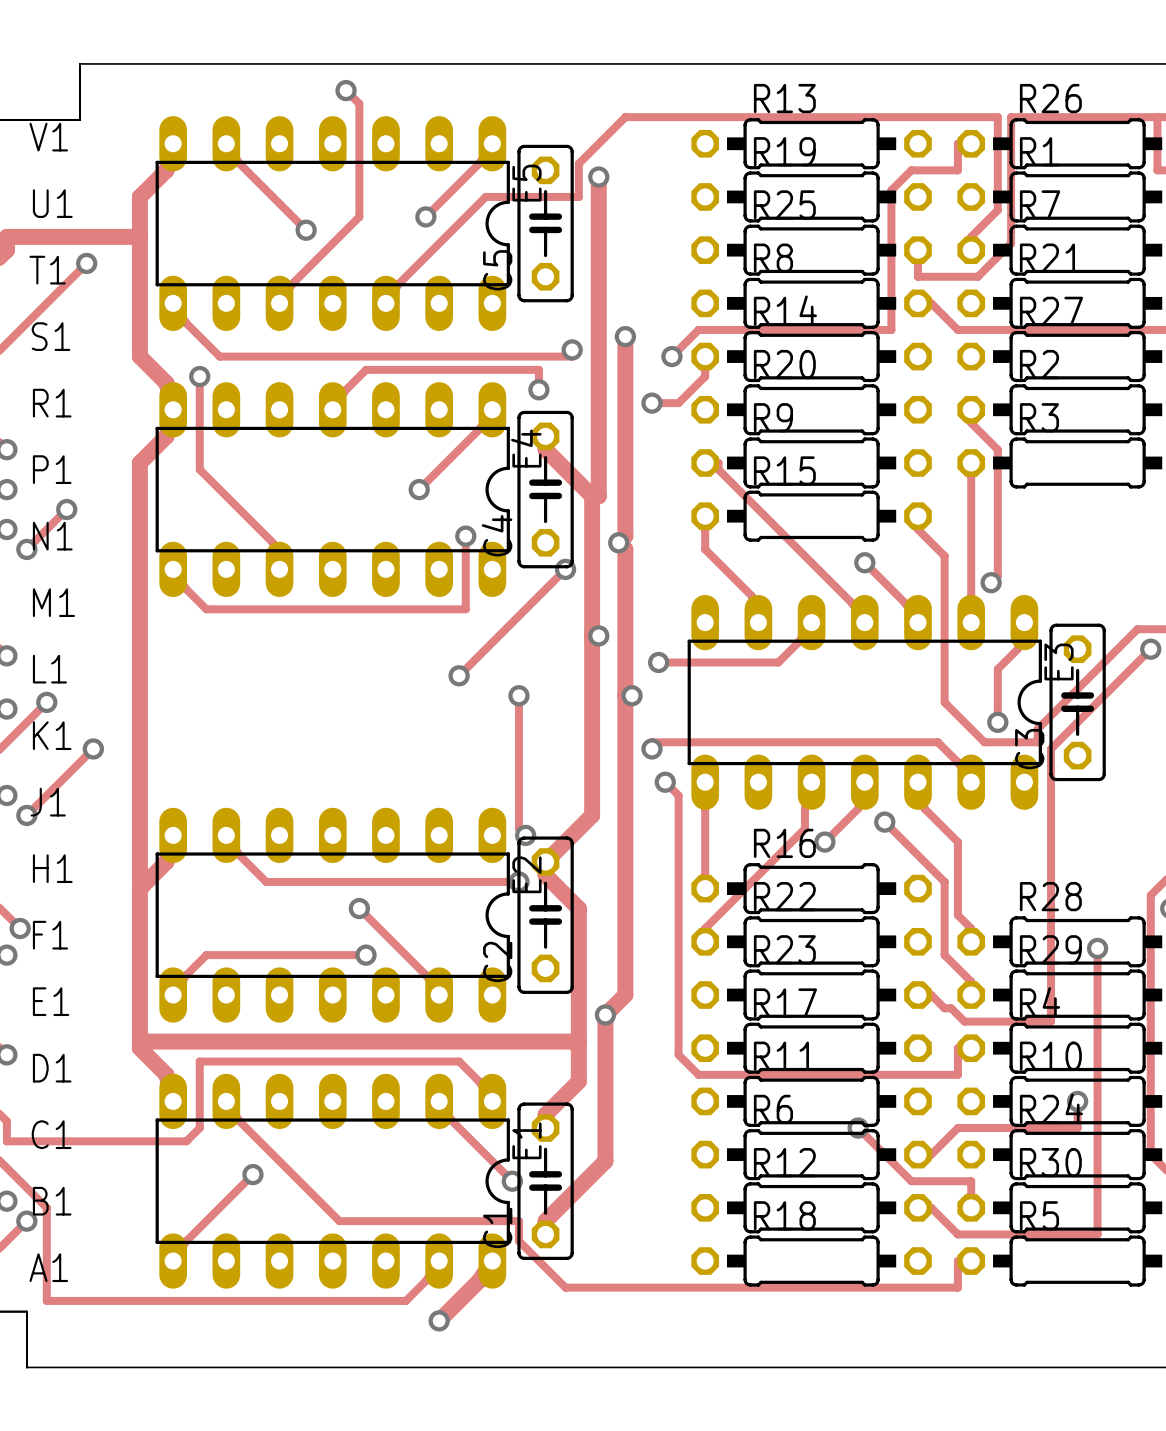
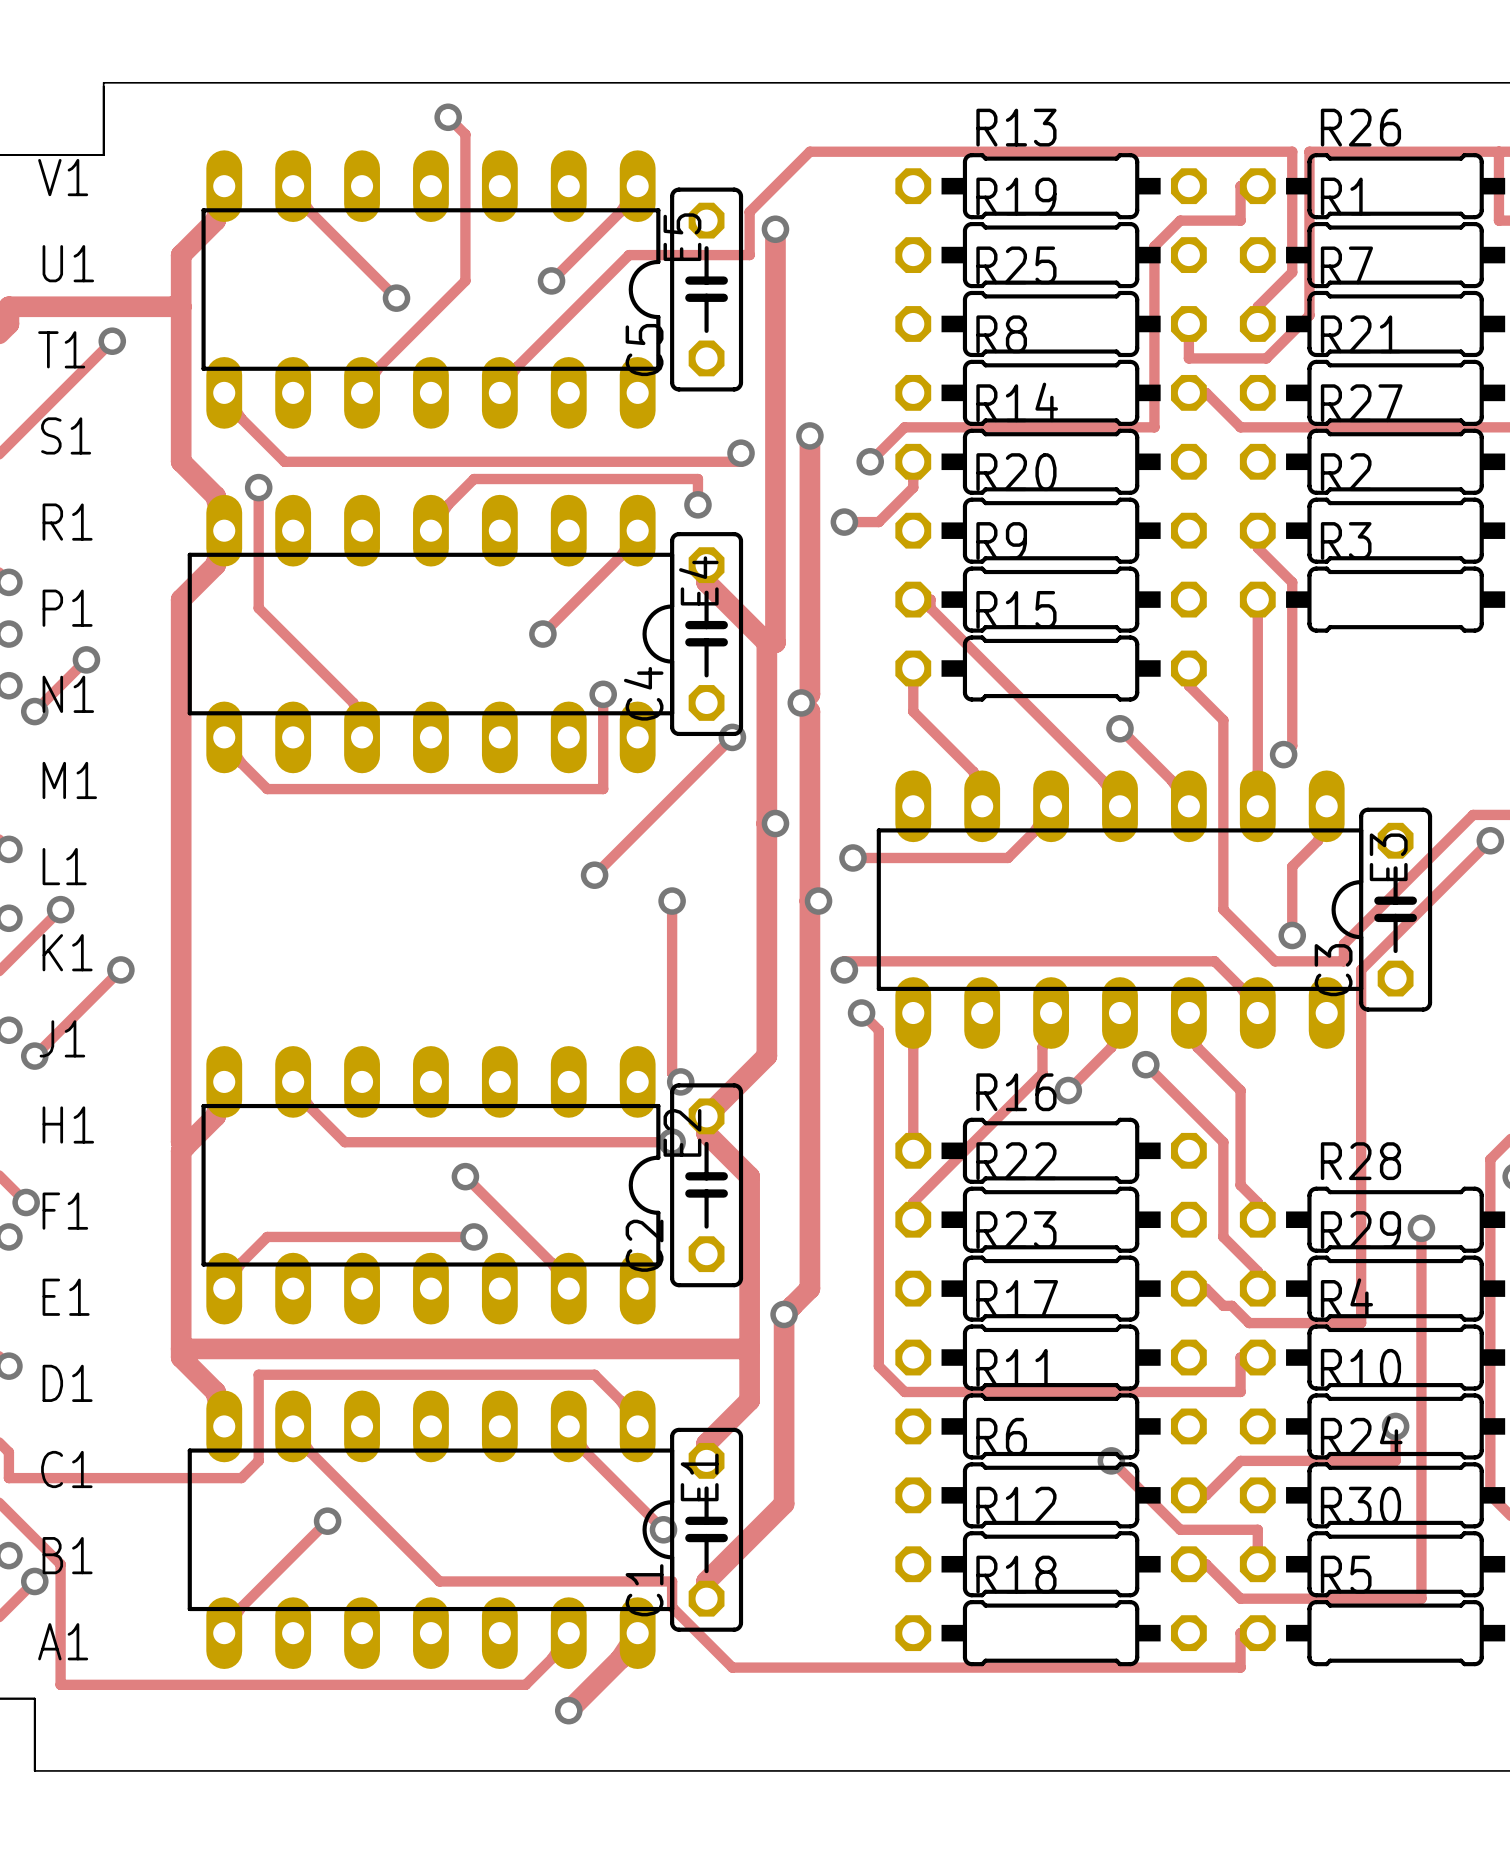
E4 footprint: [155, 382, 510, 598] -> [187, 494, 675, 774]
E4 name position: E4 (526, 448) -> E4 (698, 580)
E3 footprint: [687, 594, 1042, 810] -> [876, 770, 1364, 1049]
E3 name position: E3 (1059, 661) -> E3 (1388, 857)
E1 footprint: [155, 1073, 510, 1289] -> [187, 1390, 675, 1669]
E1 name position: E1 (526, 1140) -> E1 (699, 1477)

